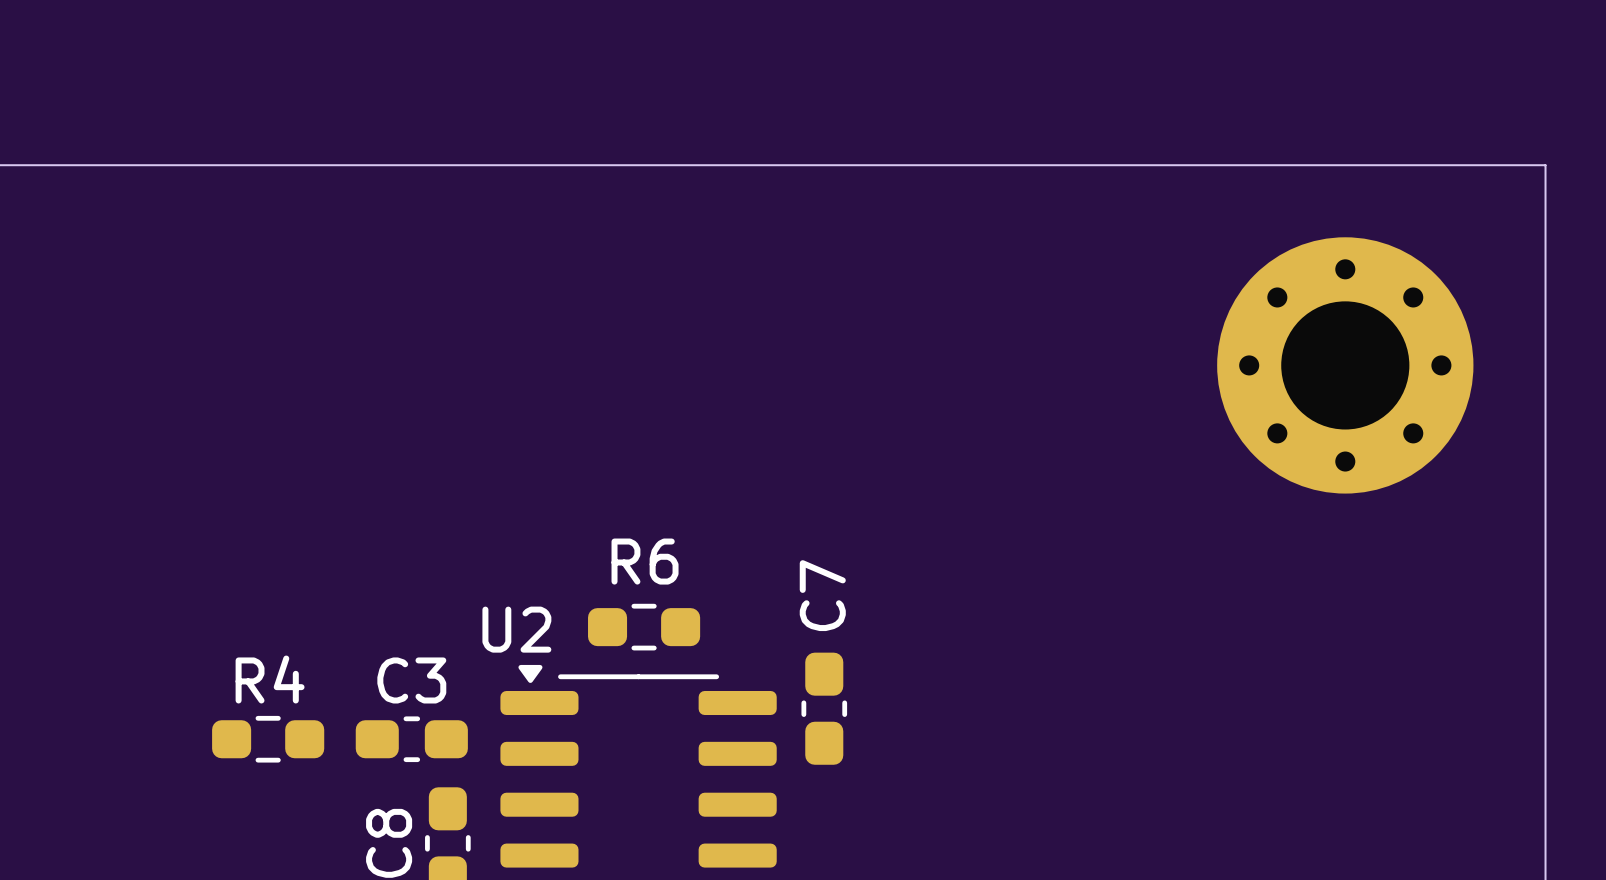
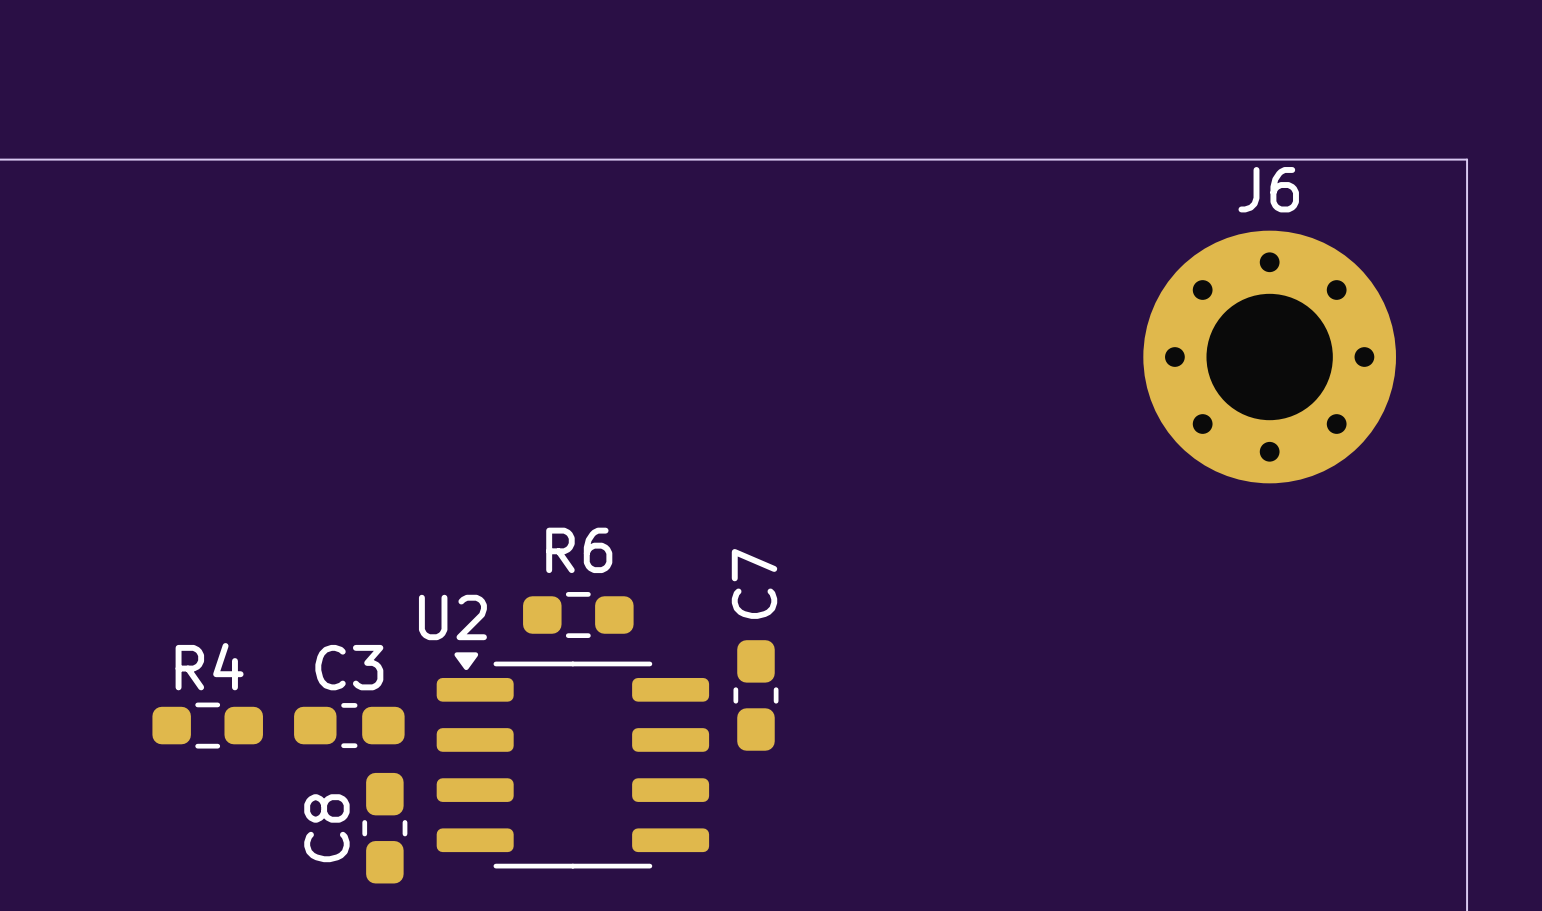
J6 name: none -> J6 (1268, 189)

